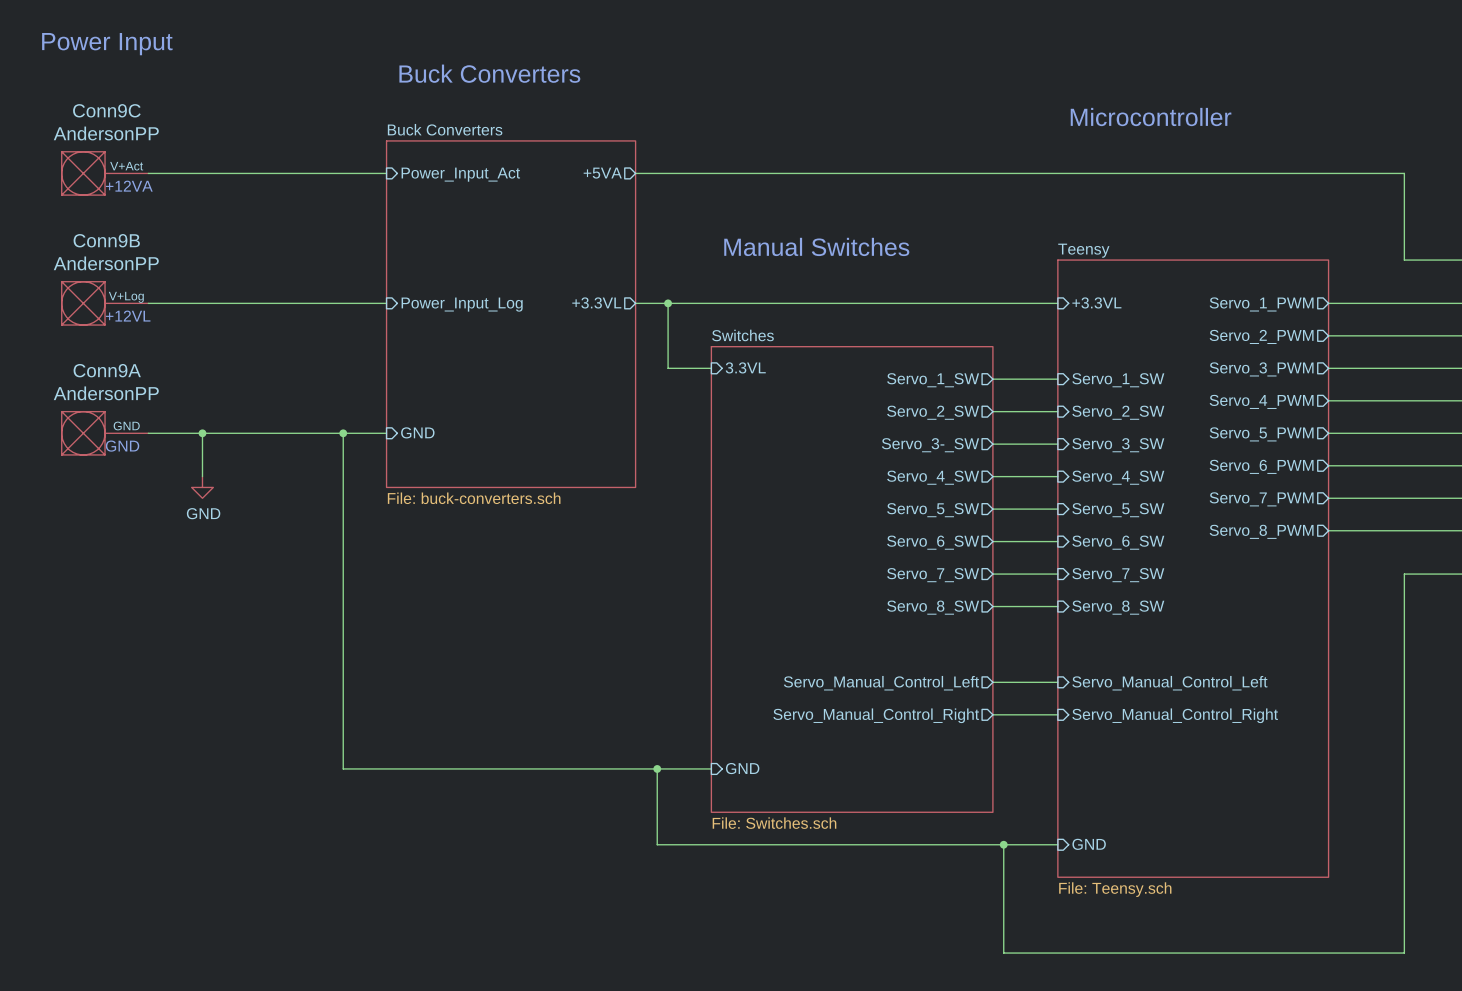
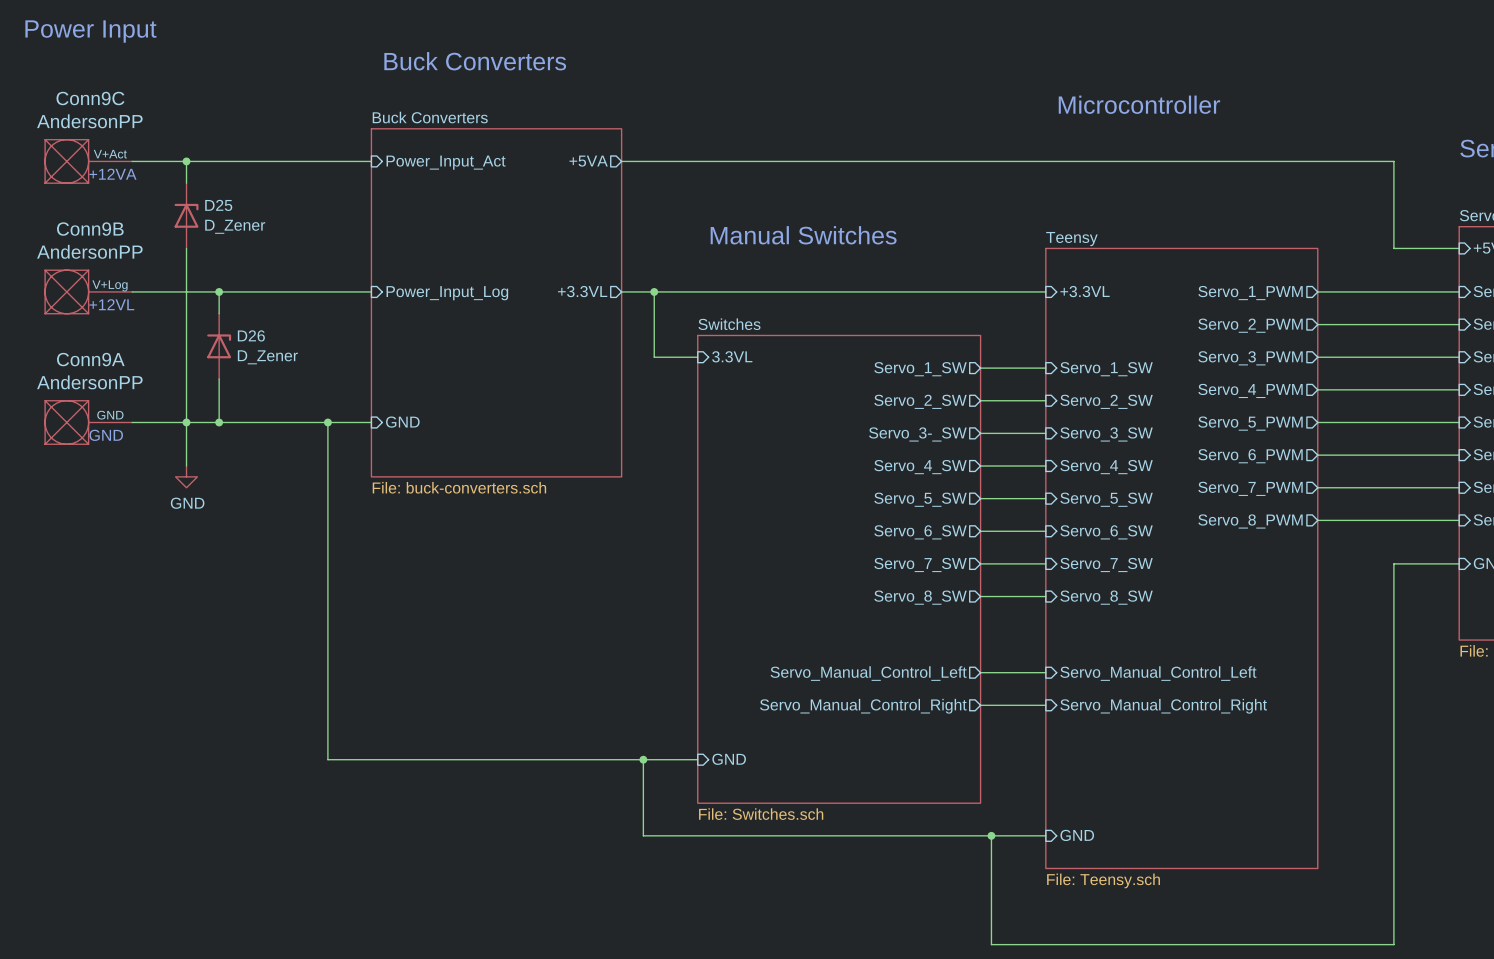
wire: none -> (186, 161) (186, 183)
junction: none -> (186, 161)
D25: none -> D_Zener (186, 215)
wire: none -> (186, 248) (186, 422)
wire: none -> (219, 291) (219, 313)
junction: none -> (219, 291)
D26: none -> D_Zener (219, 346)
wire: none -> (219, 378) (219, 422)
junction: none -> (219, 422)

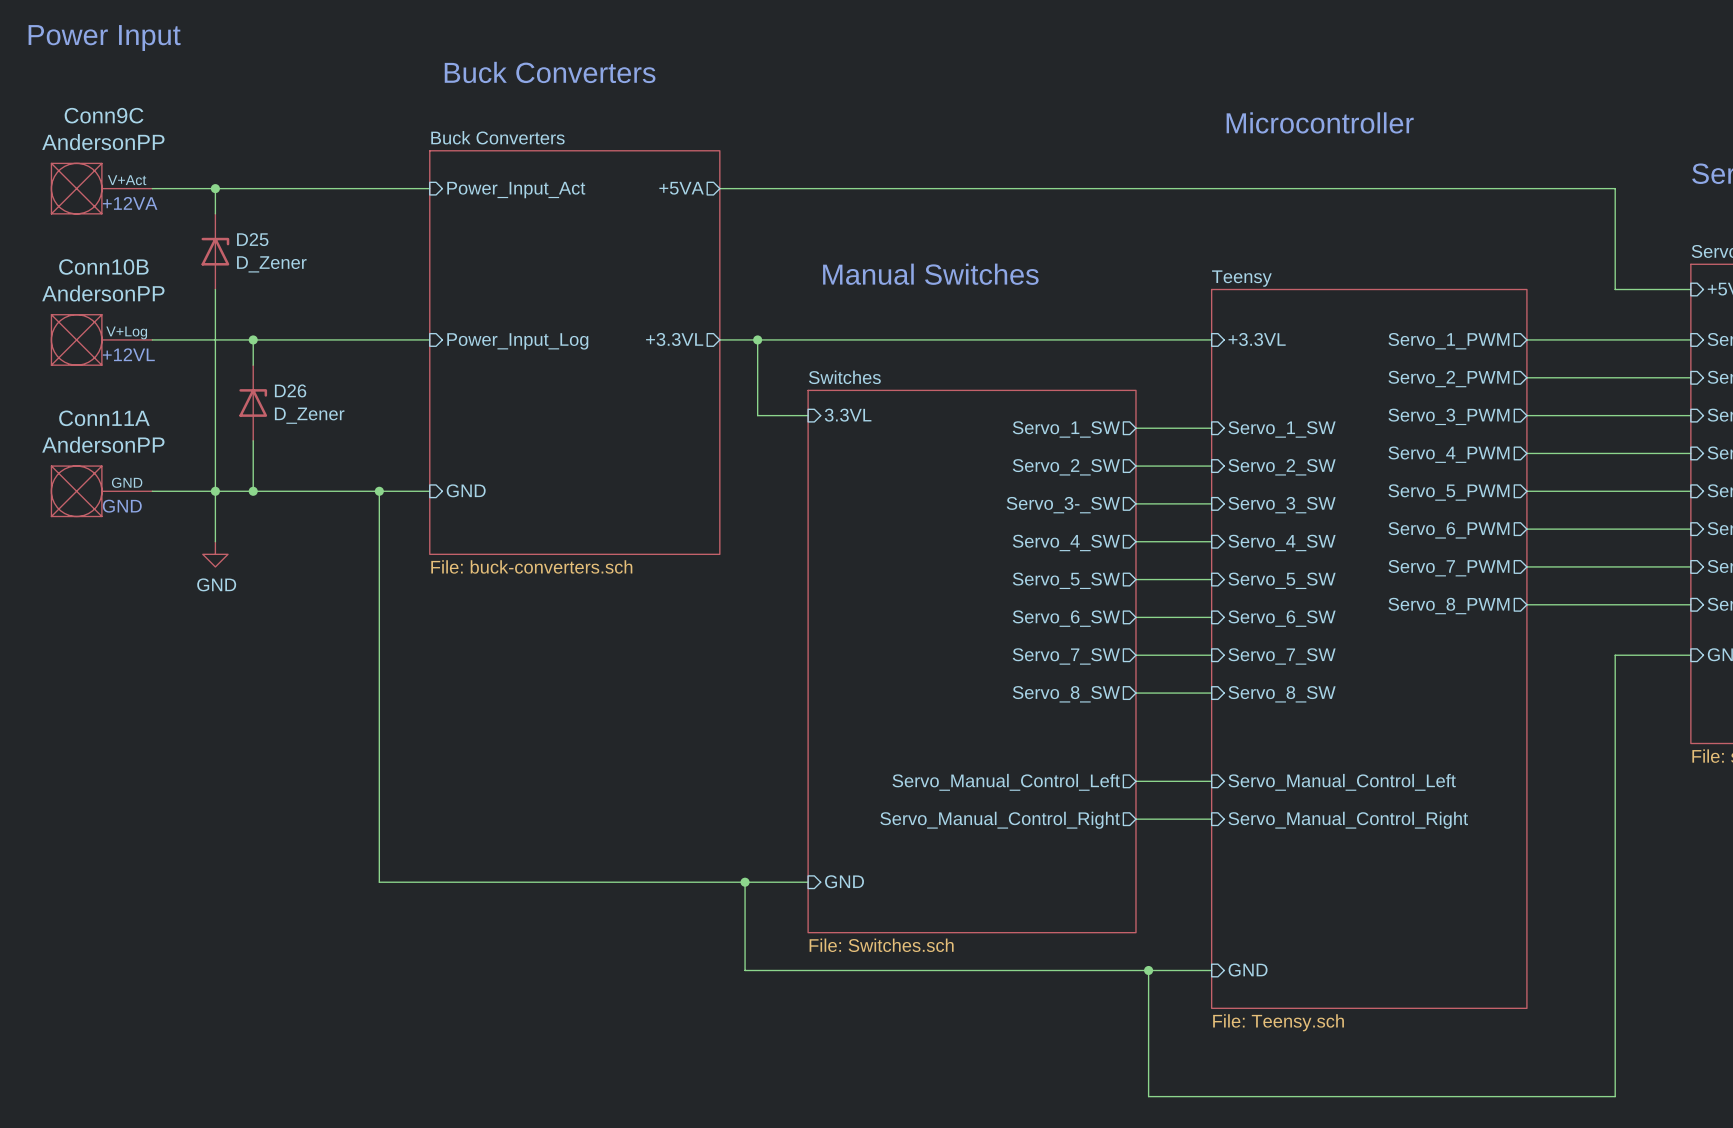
Conn9B name: Conn9B (90, 229) -> Conn10B (103, 266)
Conn9A name: Conn9A (90, 359) -> Conn11A (104, 418)

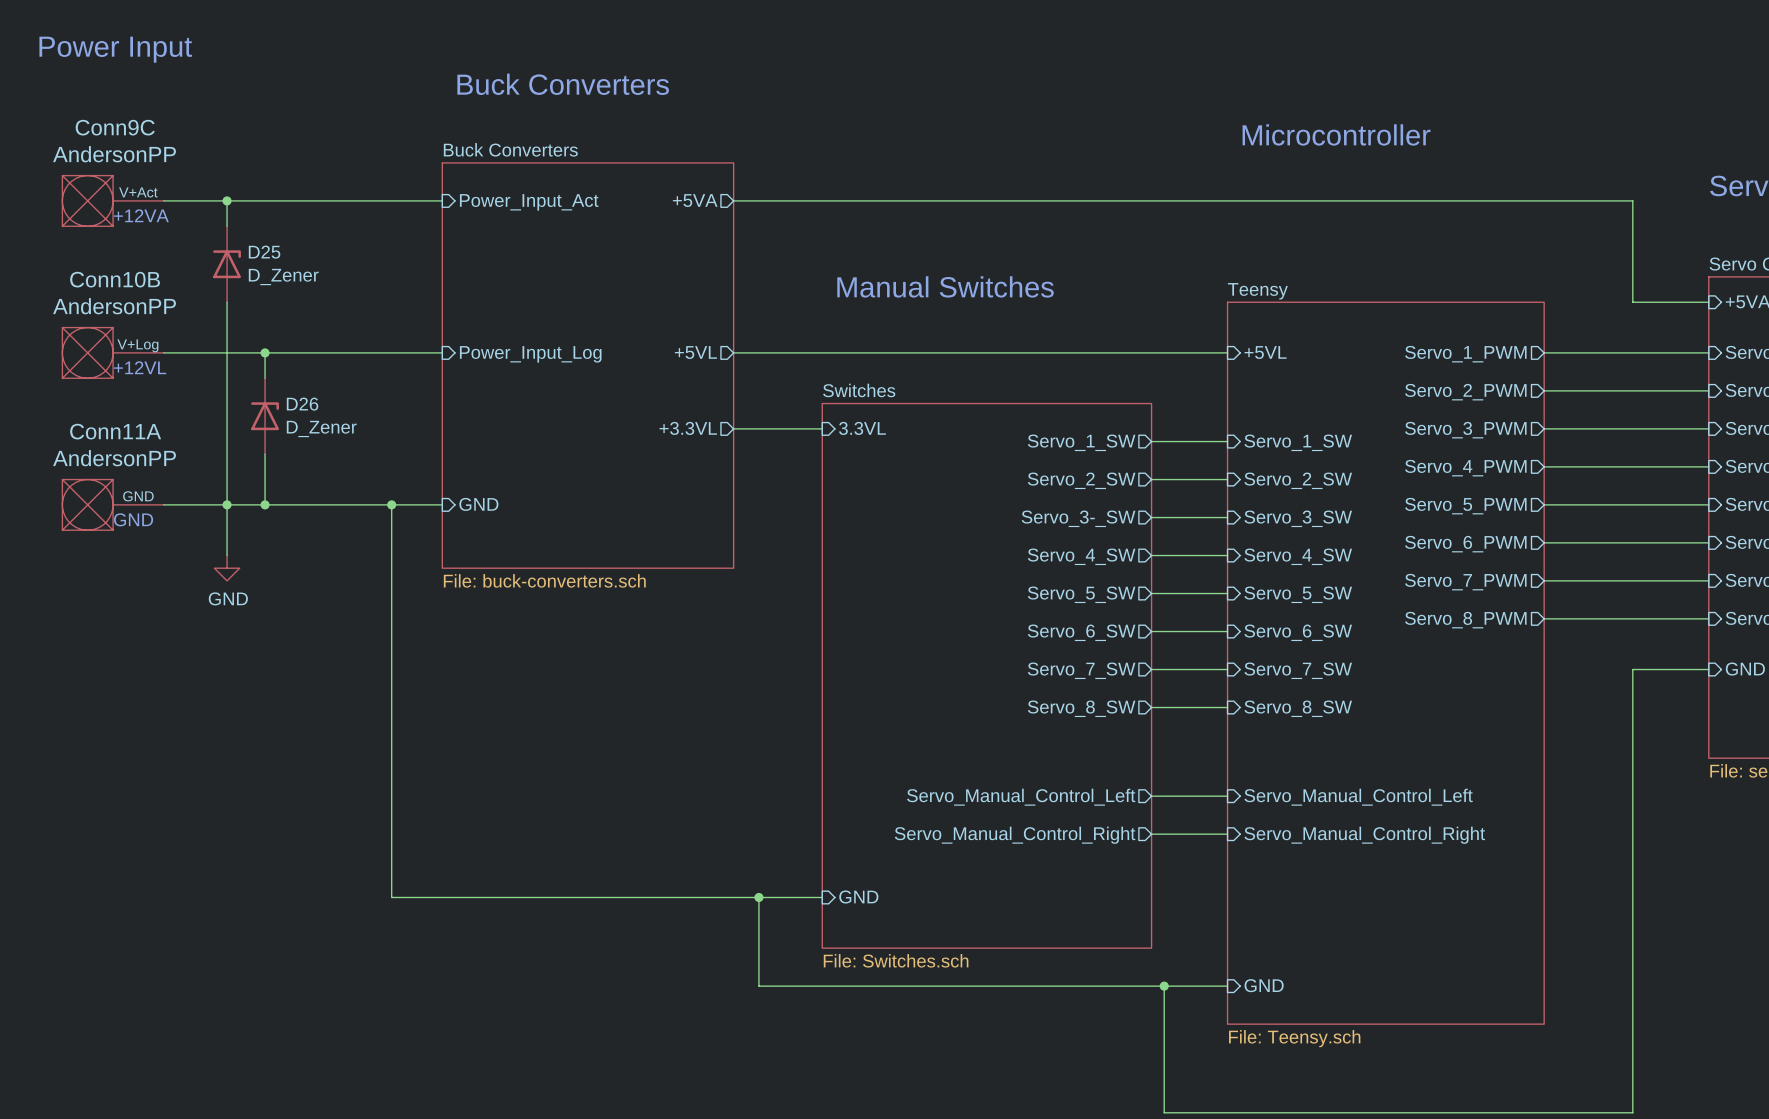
sheet pin: +3.3VL (674, 339) -> +5VL (695, 352)
wire: (757, 339) (757, 415) -> (733, 428) (771, 428)
junction: (757, 339) -> none
sheet pin: +3.3VL (1257, 339) -> +5VL (1265, 352)
sheet pin: none -> +3.3VL (688, 428)

